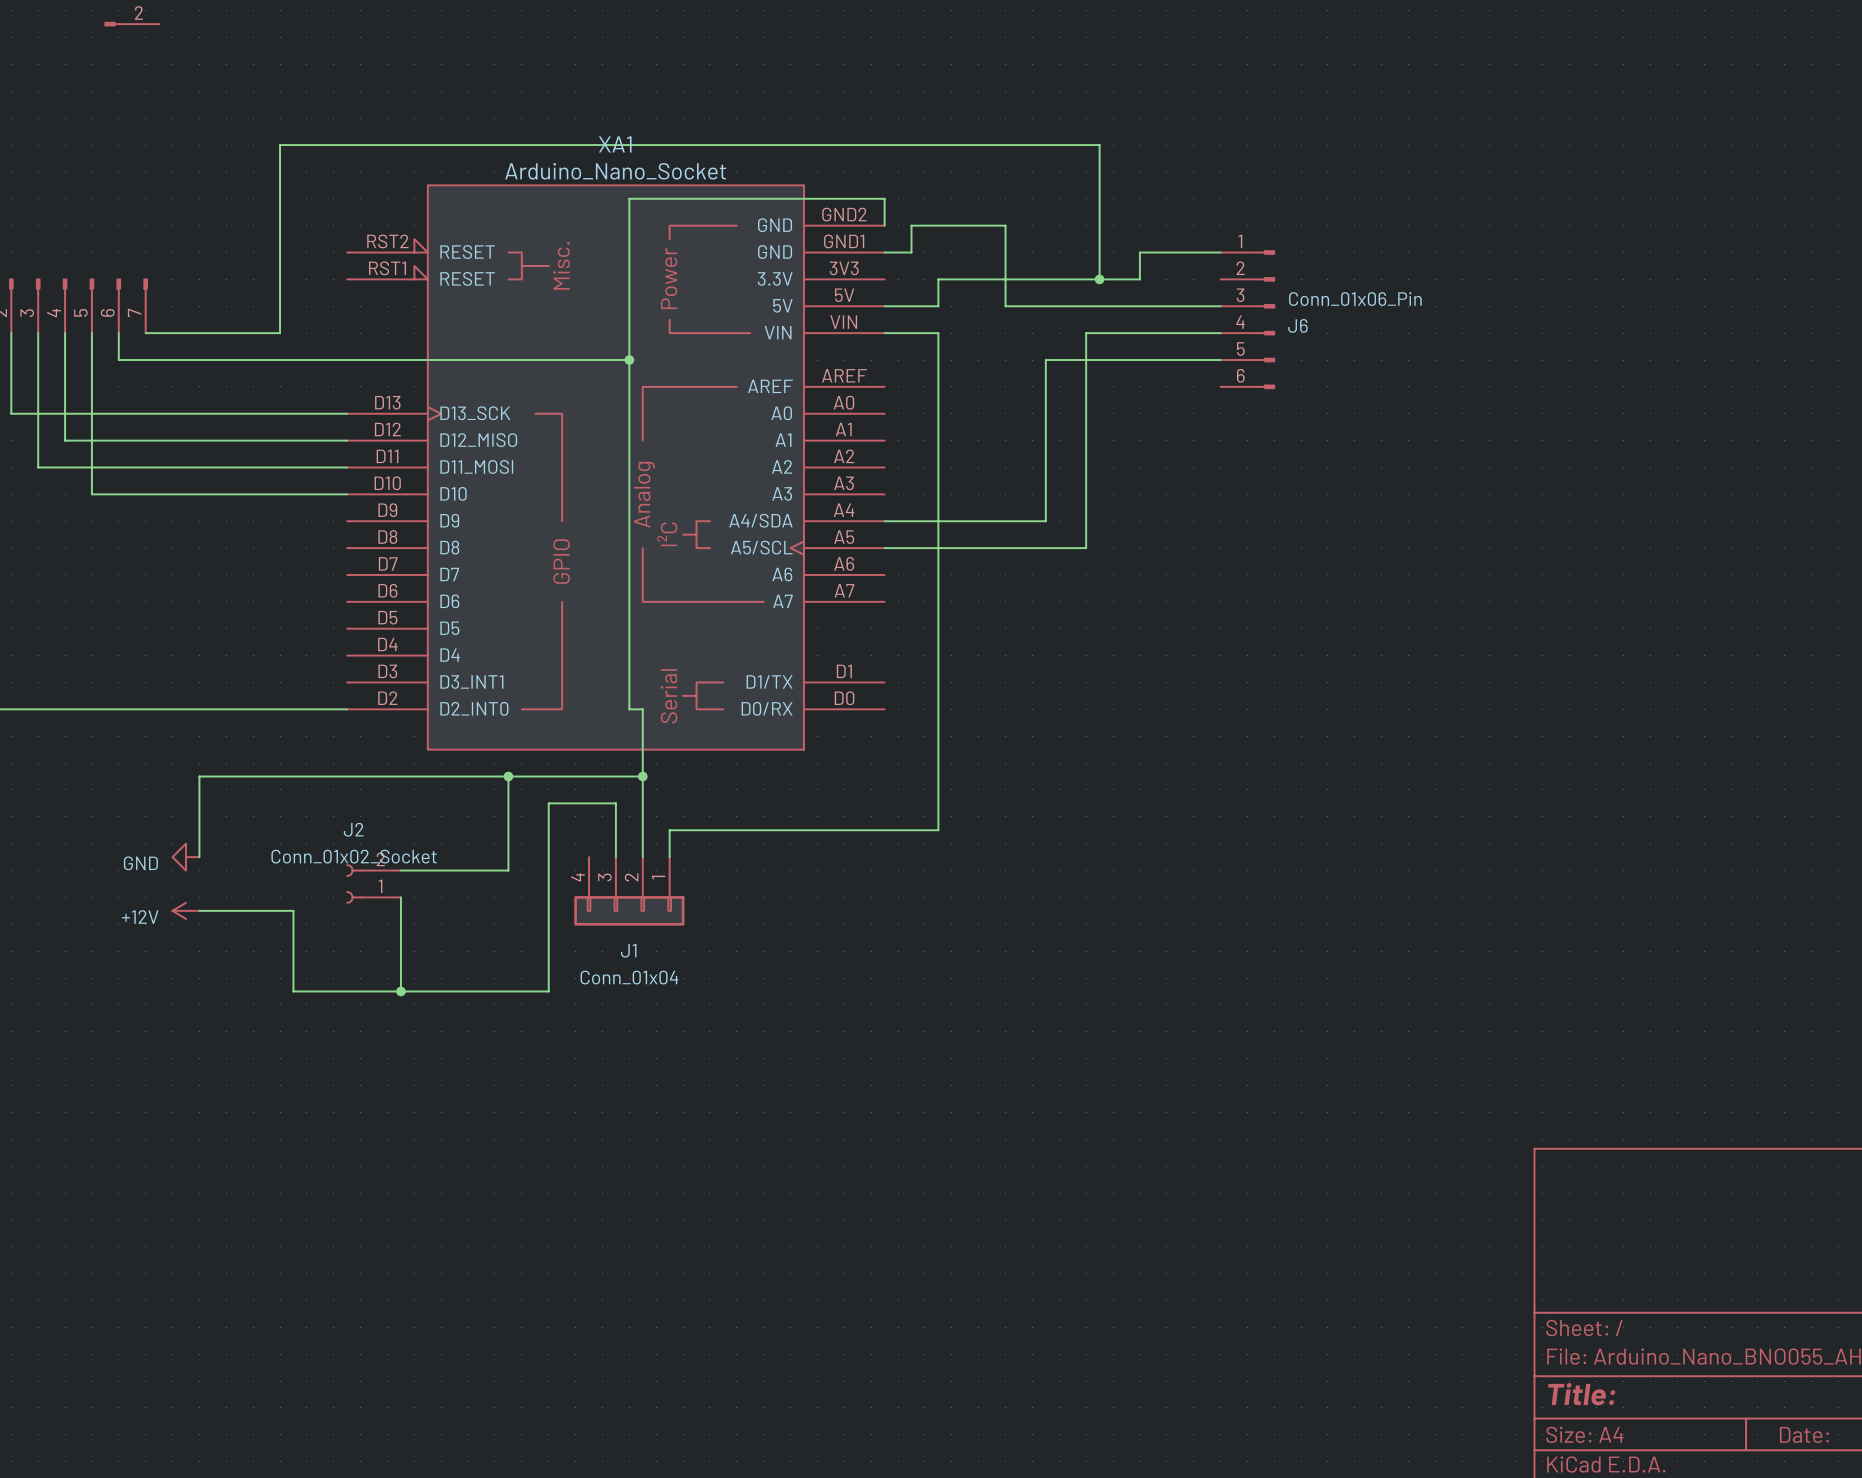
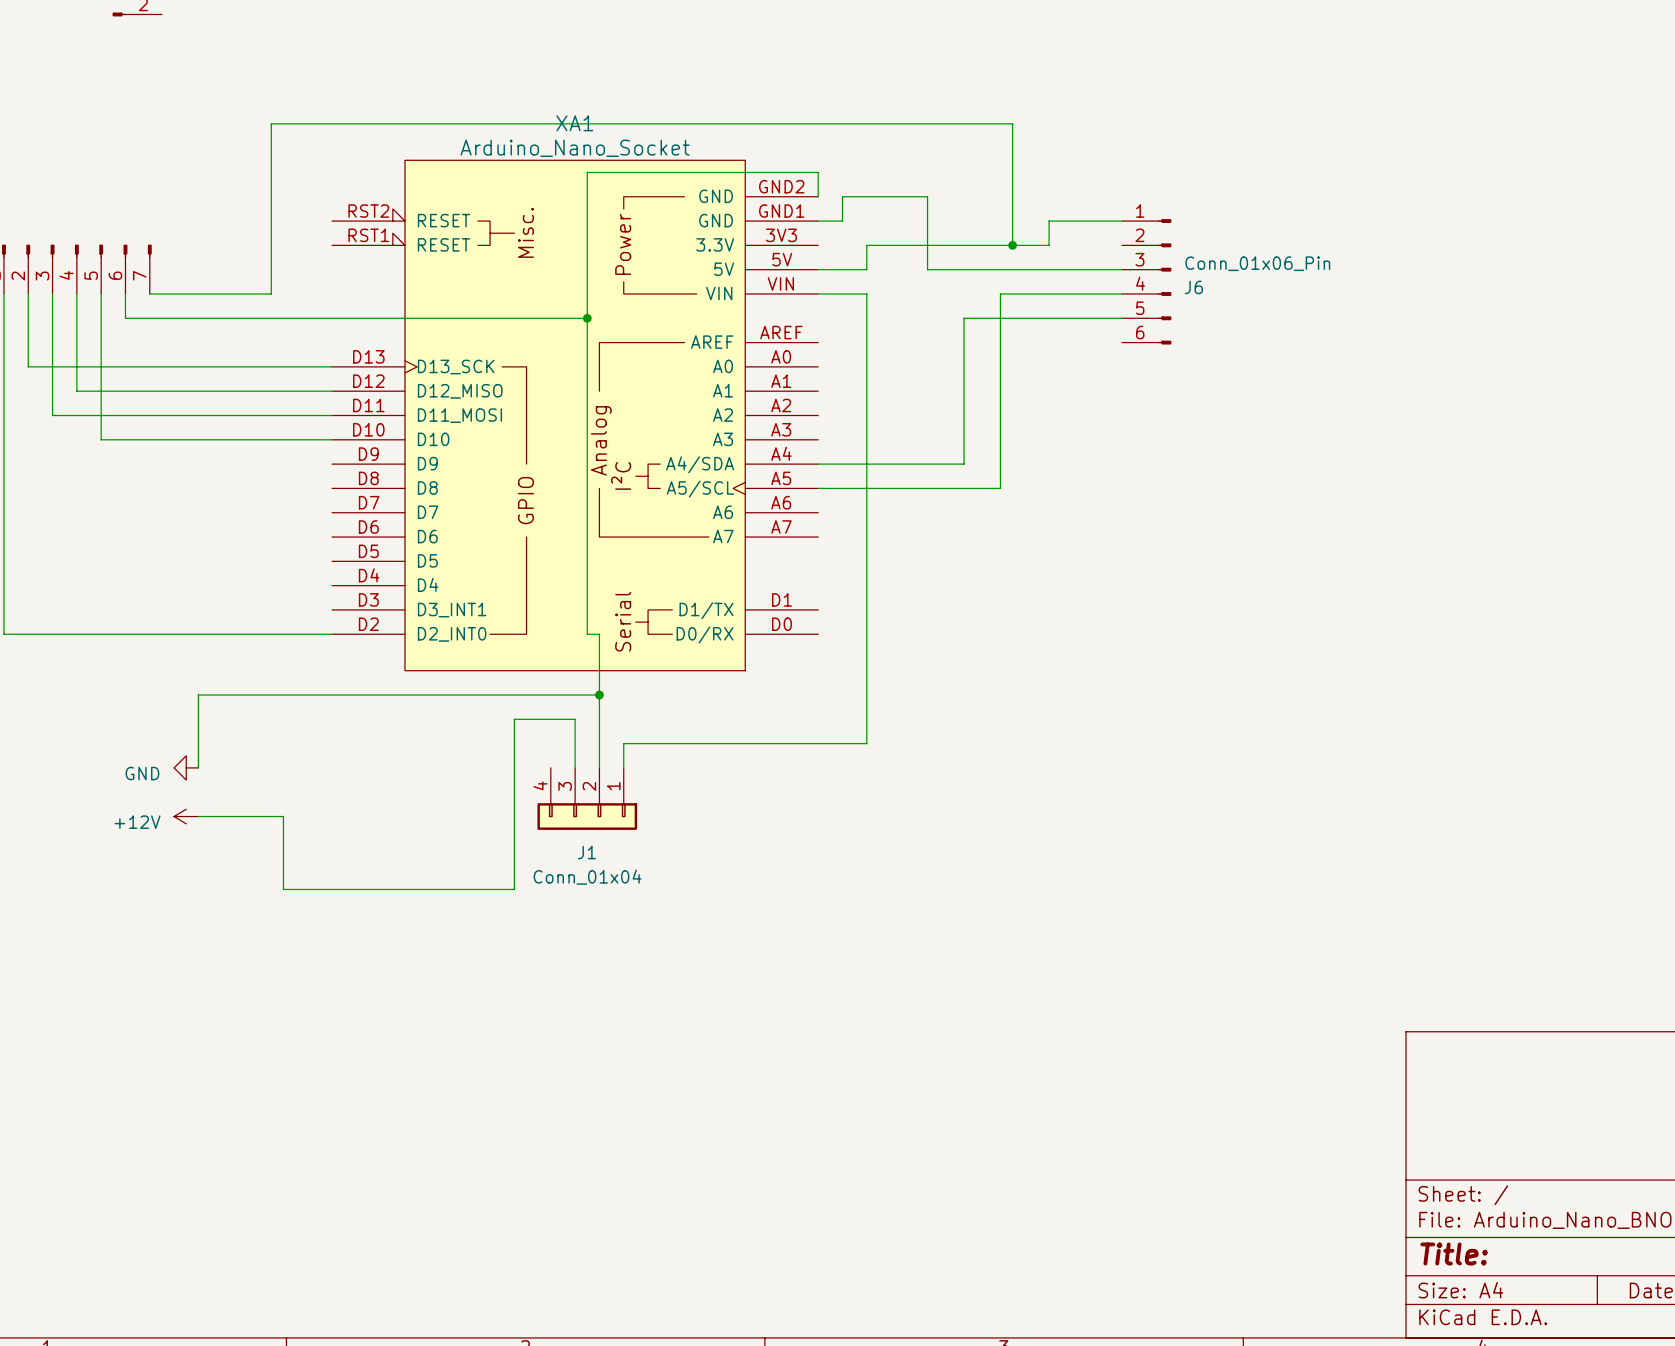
wire: (508, 776) (508, 870) (400, 870) -> none
junction: (508, 776) -> none
J2: Conn_01x02_Socket (373, 883) -> none
wire: (400, 897) (400, 991) -> none
junction: (400, 991) -> none

